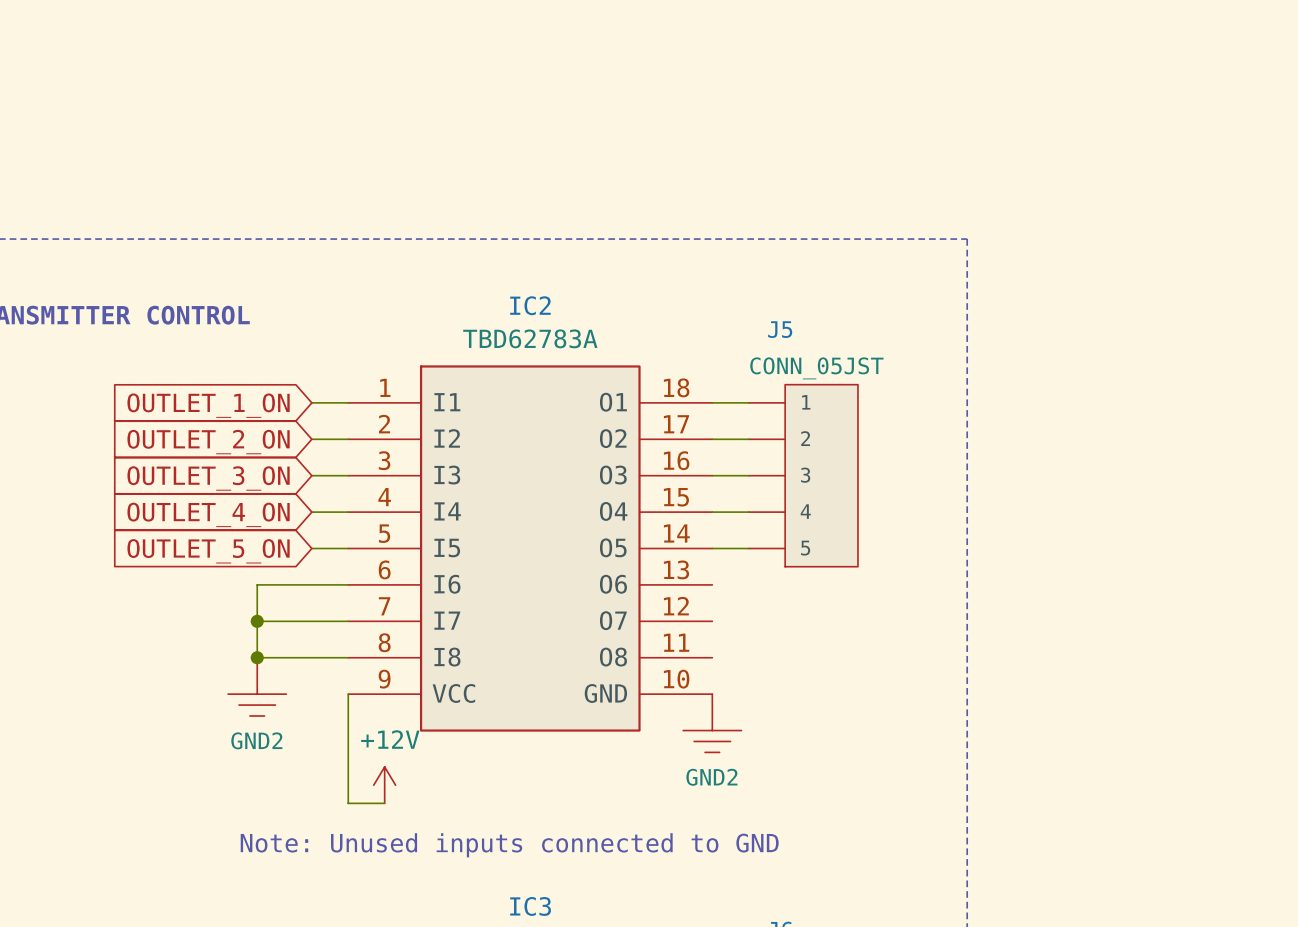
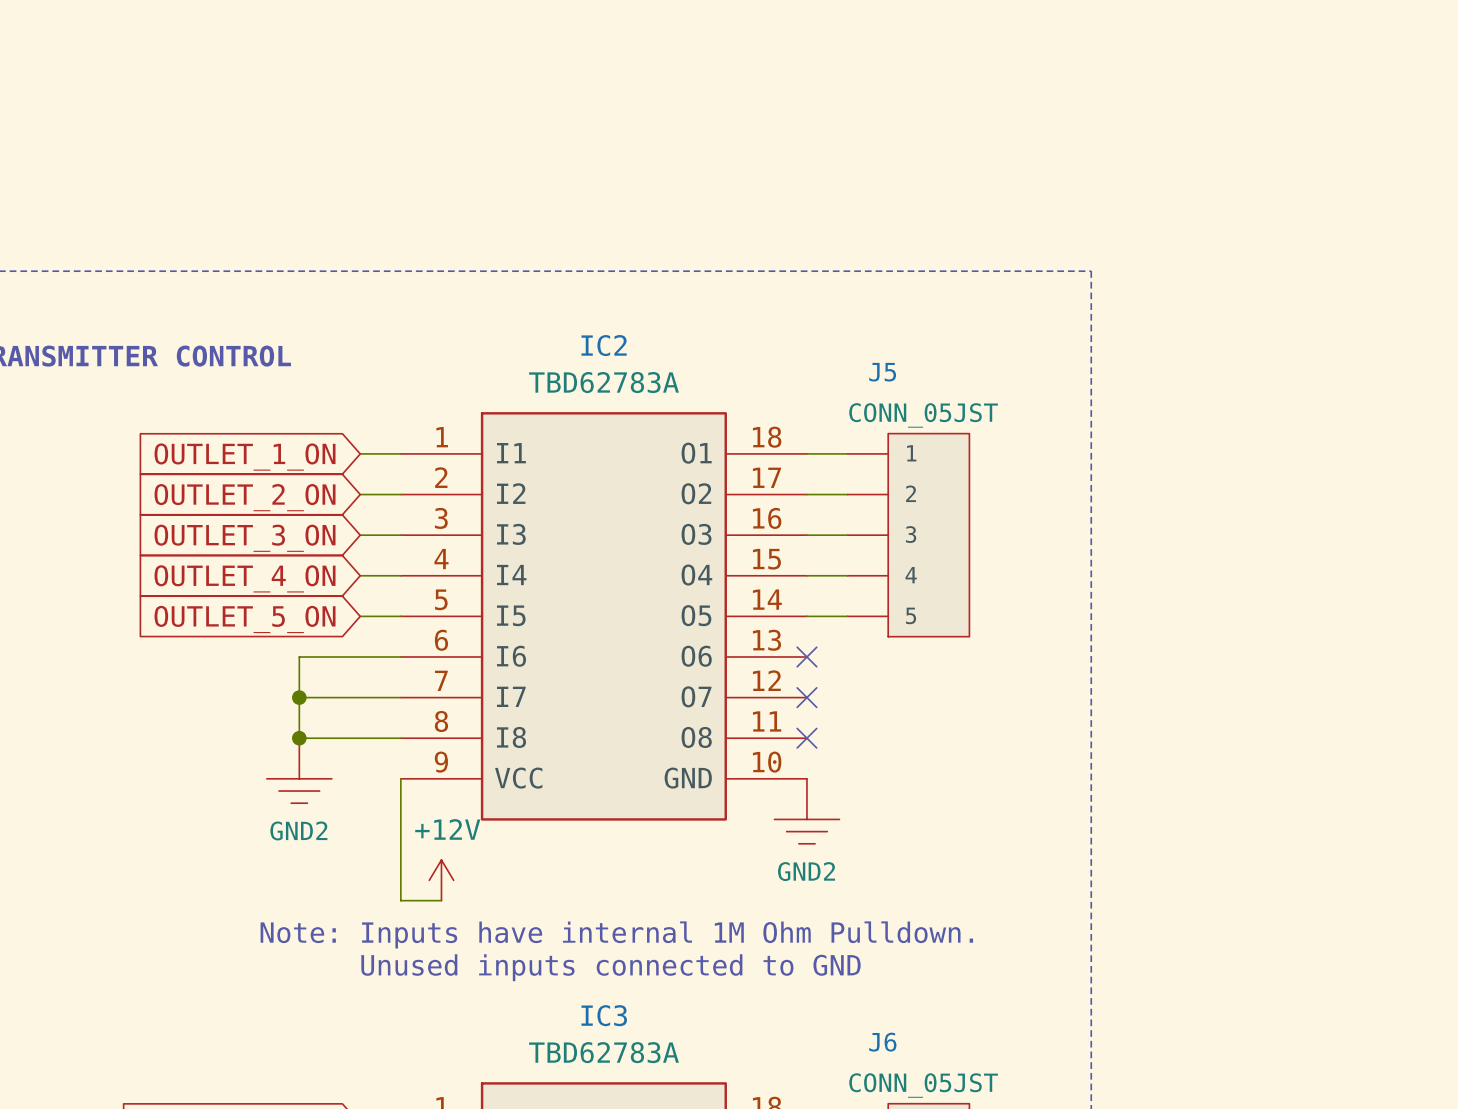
no-connect mark: none -> (806, 656)
no-connect mark: none -> (806, 697)
no-connect mark: none -> (806, 738)
text: none -> Note: Inputs have internal 1M Ohm Pulldown. (616, 934)
text: Note: Unused inputs connected to GND (509, 845) -> Unused inputs connected to GND (610, 967)

